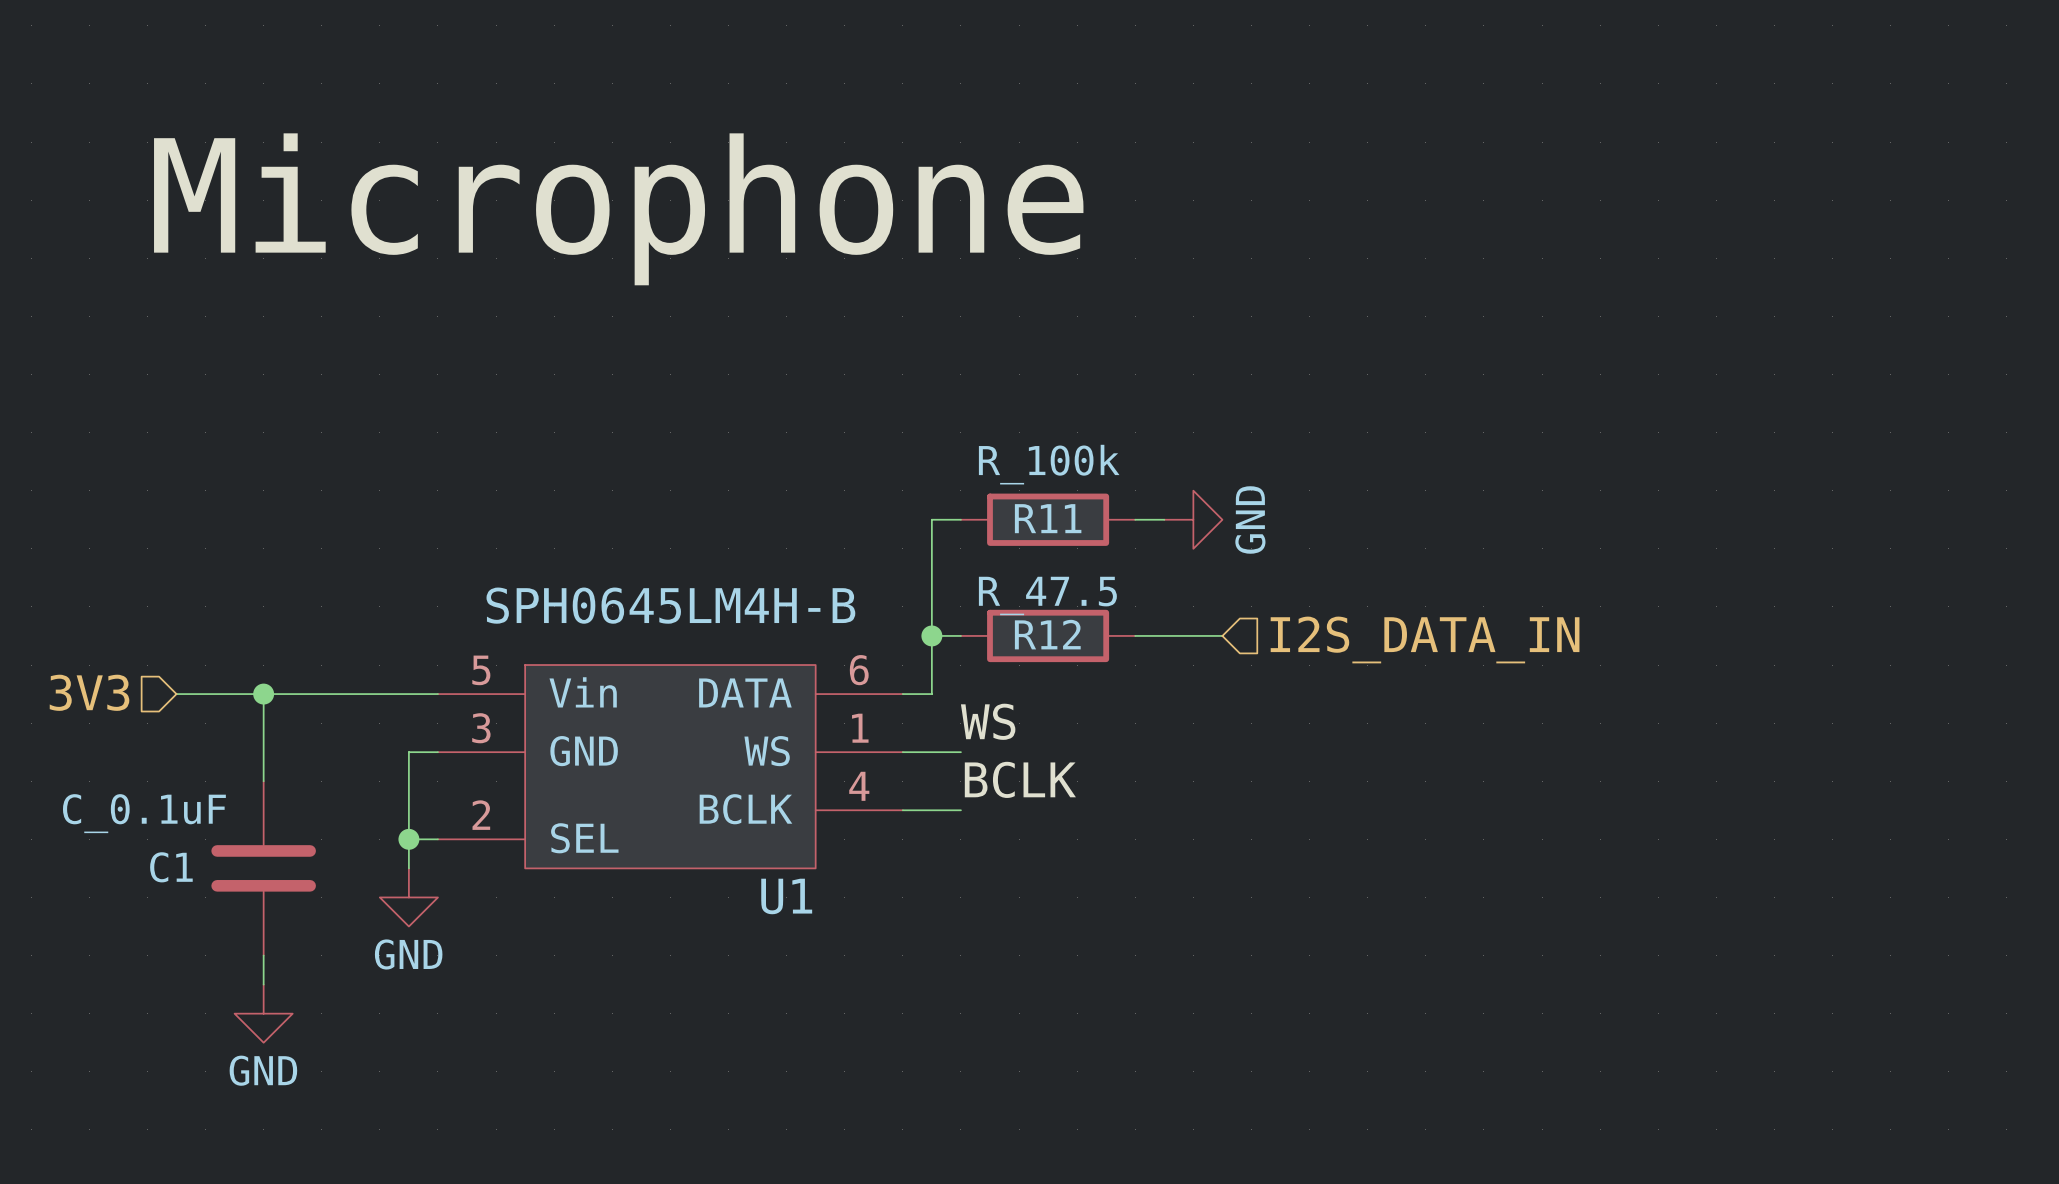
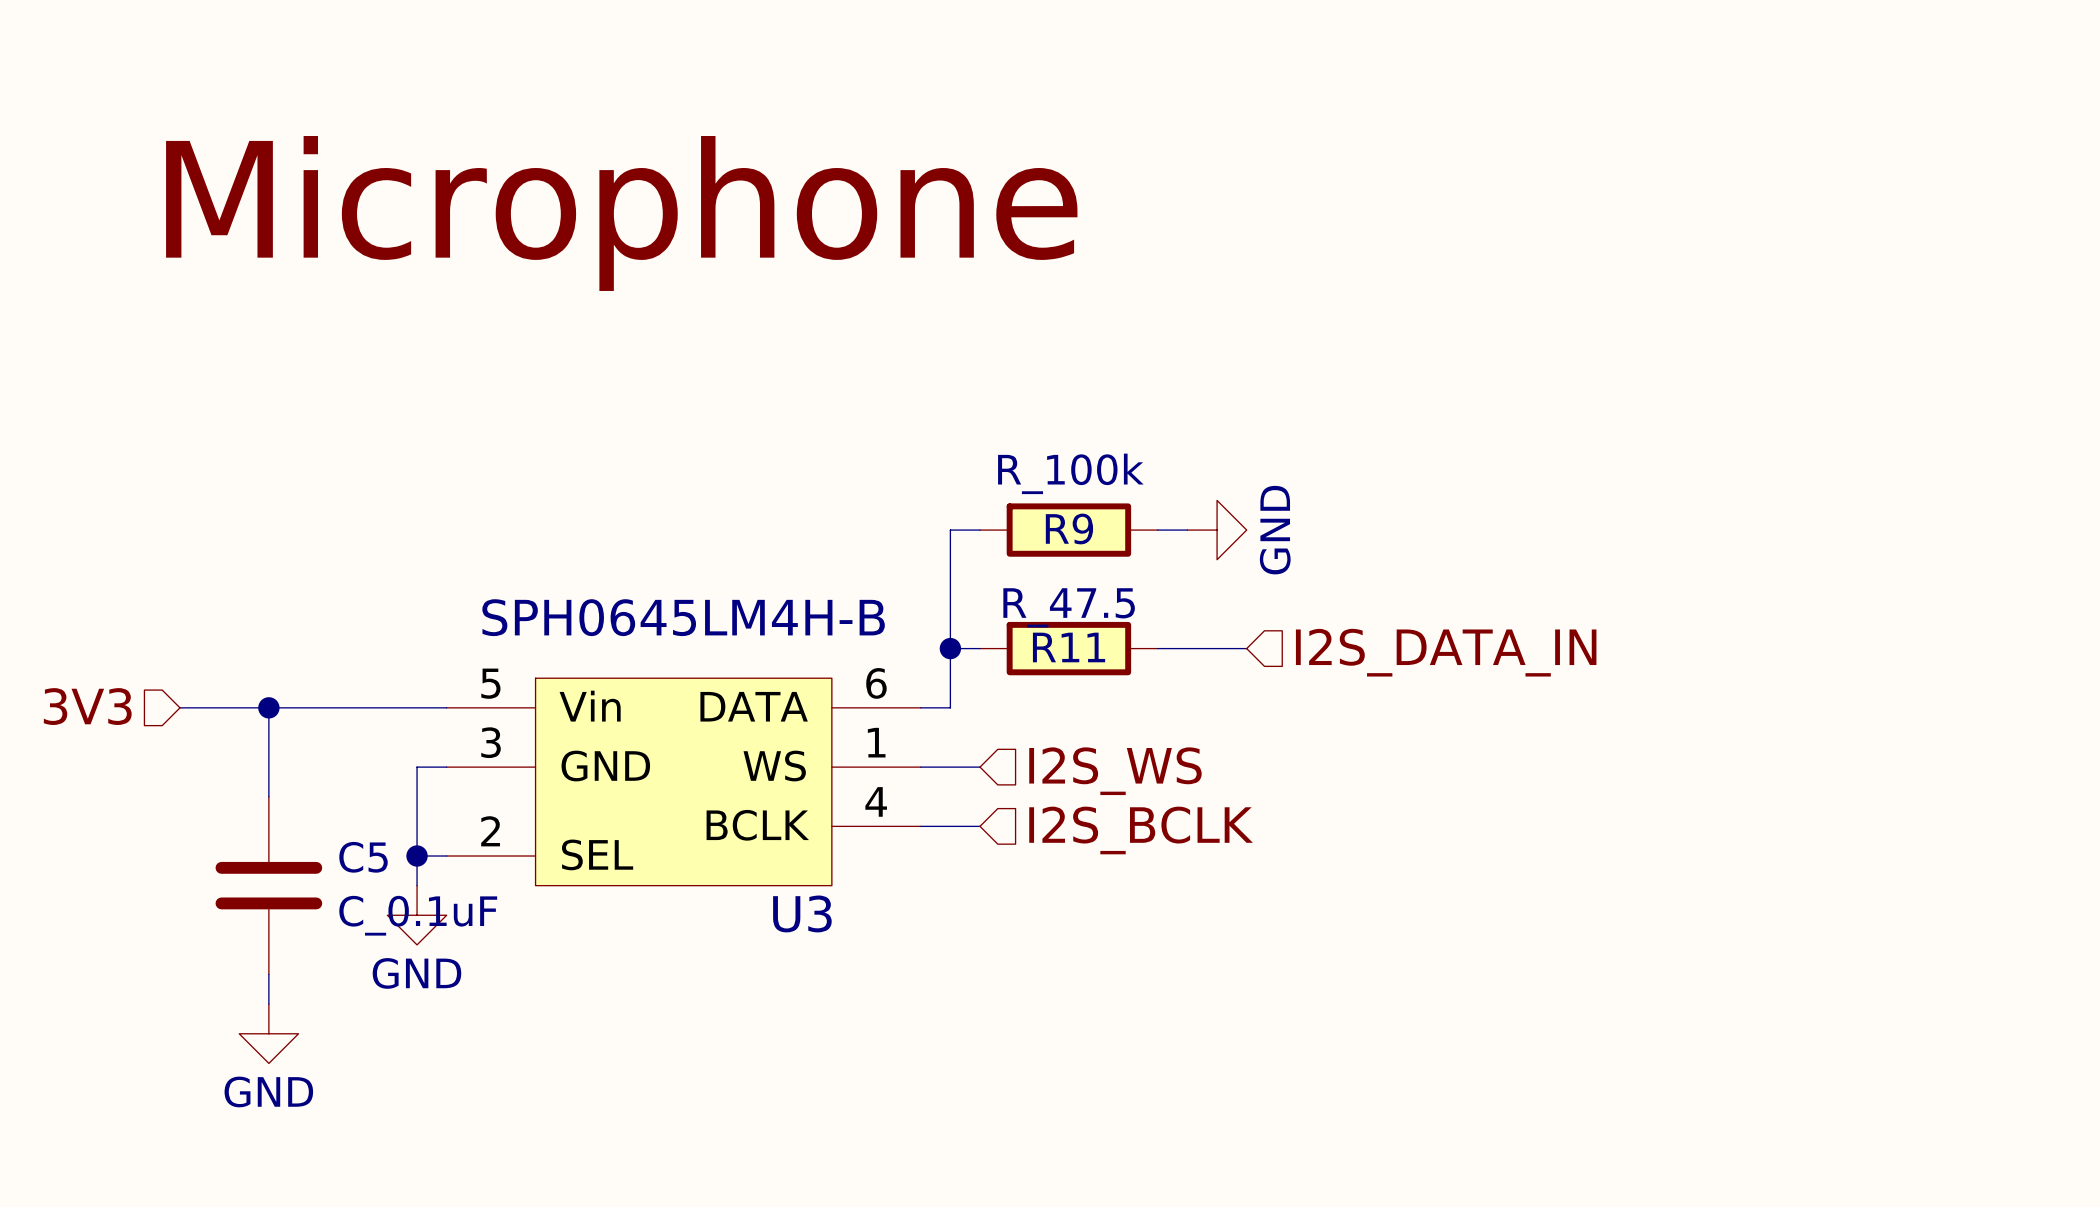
R11 name: R11 (1048, 518) -> R9 (1069, 528)
R12 name: R12 (1047, 634) -> R11 (1069, 647)
label: WS (988, 721) -> none
hierarchical label: none -> I2S_WS (1115, 771)
label: BCLK (1020, 779) -> none
C1 value position: C_0.1uF (144, 813) -> C_0.1uF (418, 915)
hierarchical label: none -> I2S_BCLK (1141, 830)
C1 name: C1 (171, 867) -> C5 (363, 857)
U1 name: U1 (786, 896) -> U3 (802, 913)

